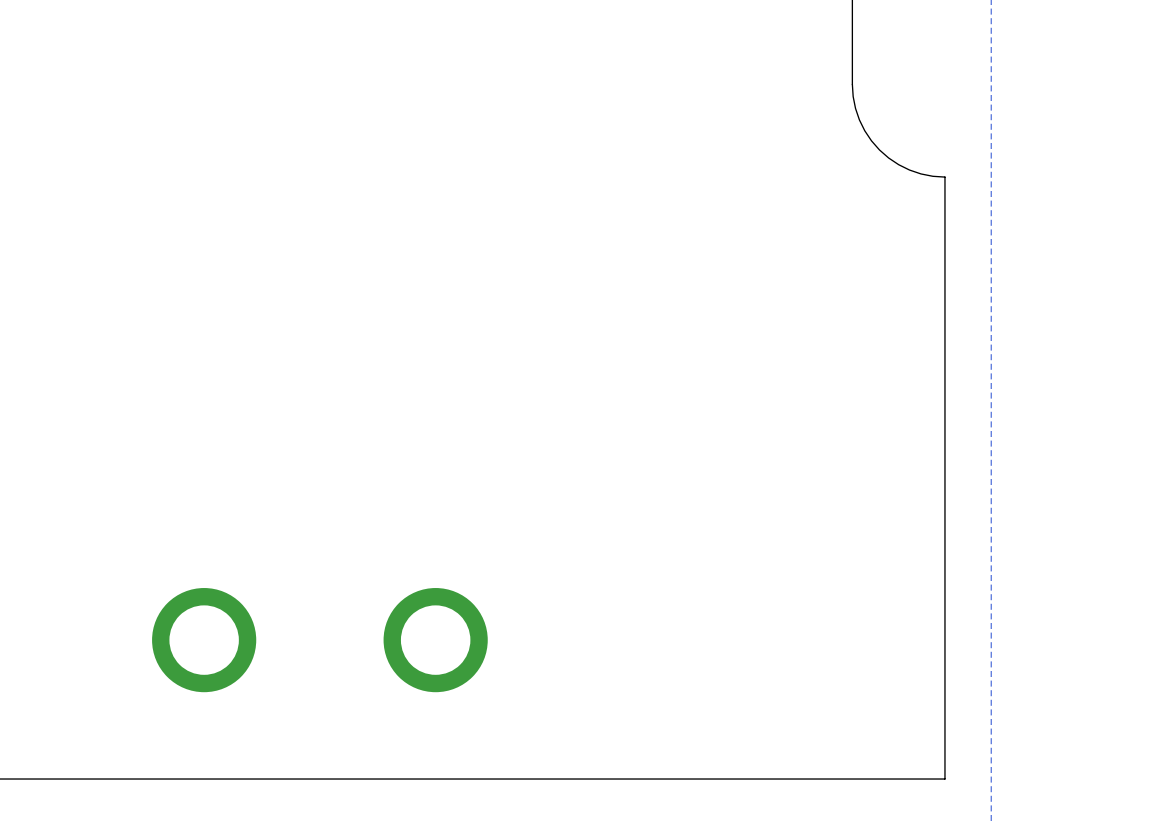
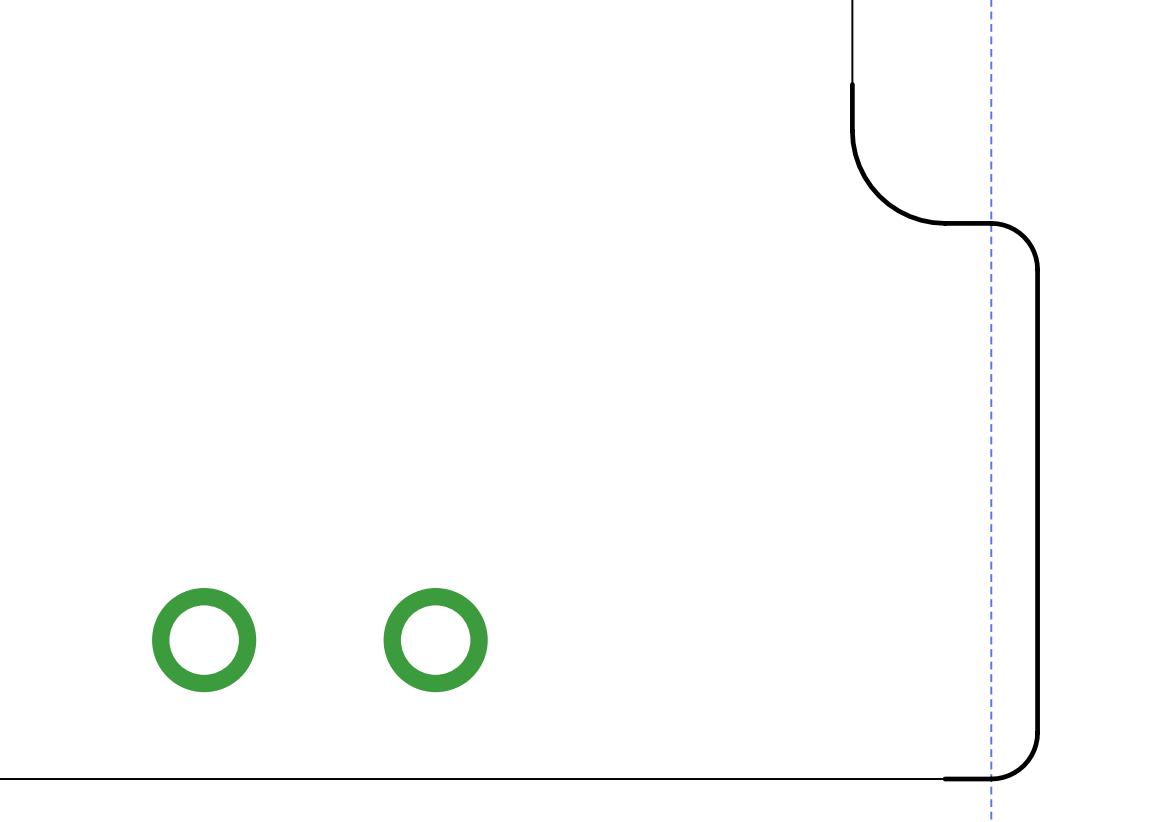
board edge: (852, 84) (855, 108) (859, 119) (864, 130) (879, 149) (898, 164) (909, 170) (921, 173) (944, 177) (944, 779) -> (852, 84) (852, 130) (855, 154) (864, 177) (879, 196) (898, 210) (921, 220) (944, 223) (997, 223) (1009, 226) (1019, 232) (1028, 241) (1034, 251) (1037, 263) (1037, 738) (1034, 750) (1028, 760) (1019, 769) (1009, 775) (991, 779) (944, 779)

